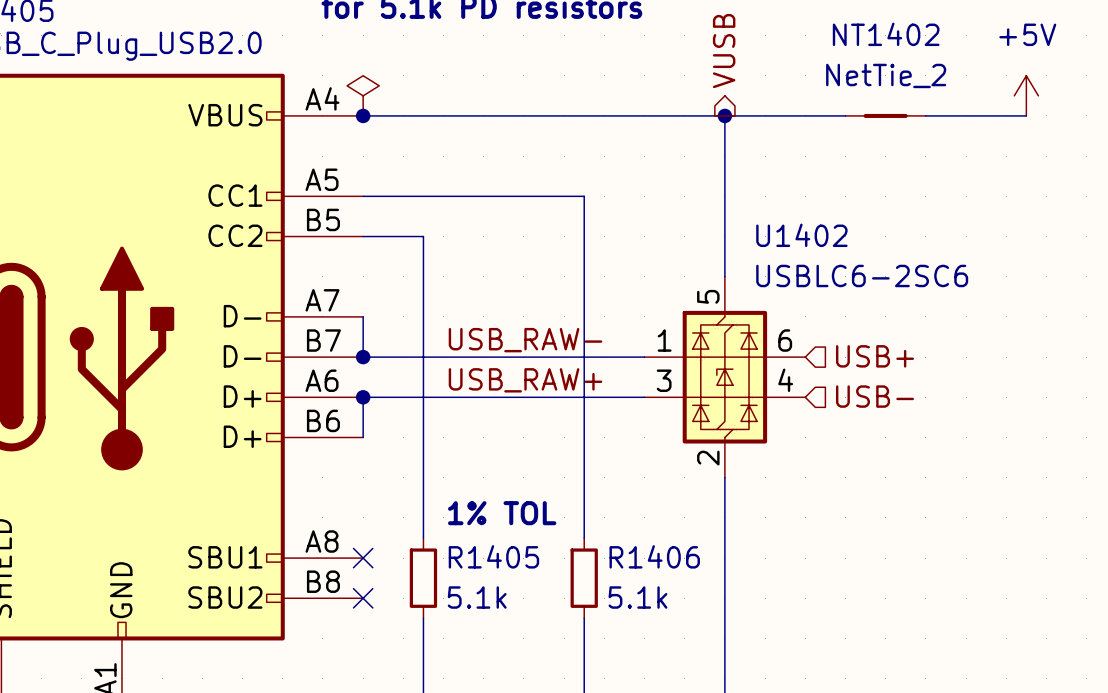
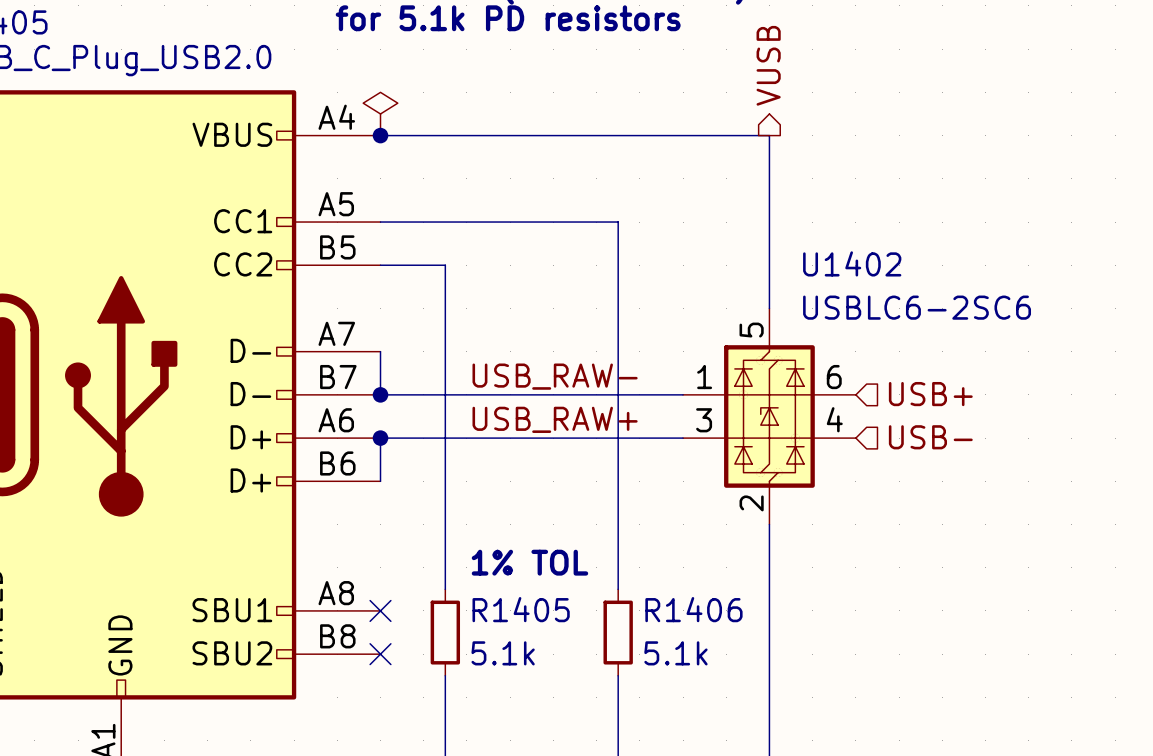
power symbol: +5V (1026, 95) -> none
wire: (724, 115) (845, 115) -> none
junction: (724, 115) -> none
NT1402: NetTie_2 (885, 115) -> none
wire: (925, 115) (1026, 115) -> none

